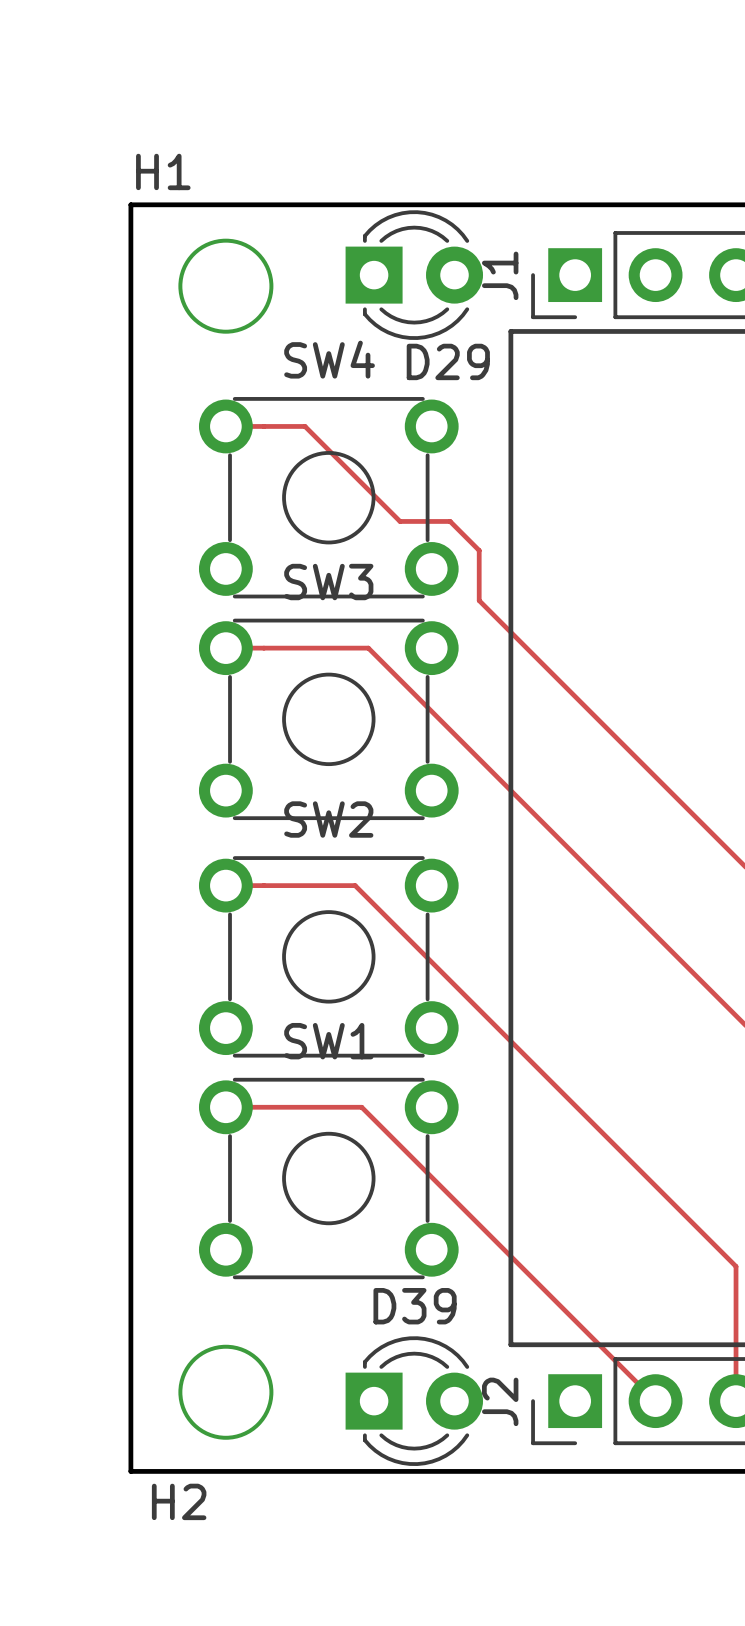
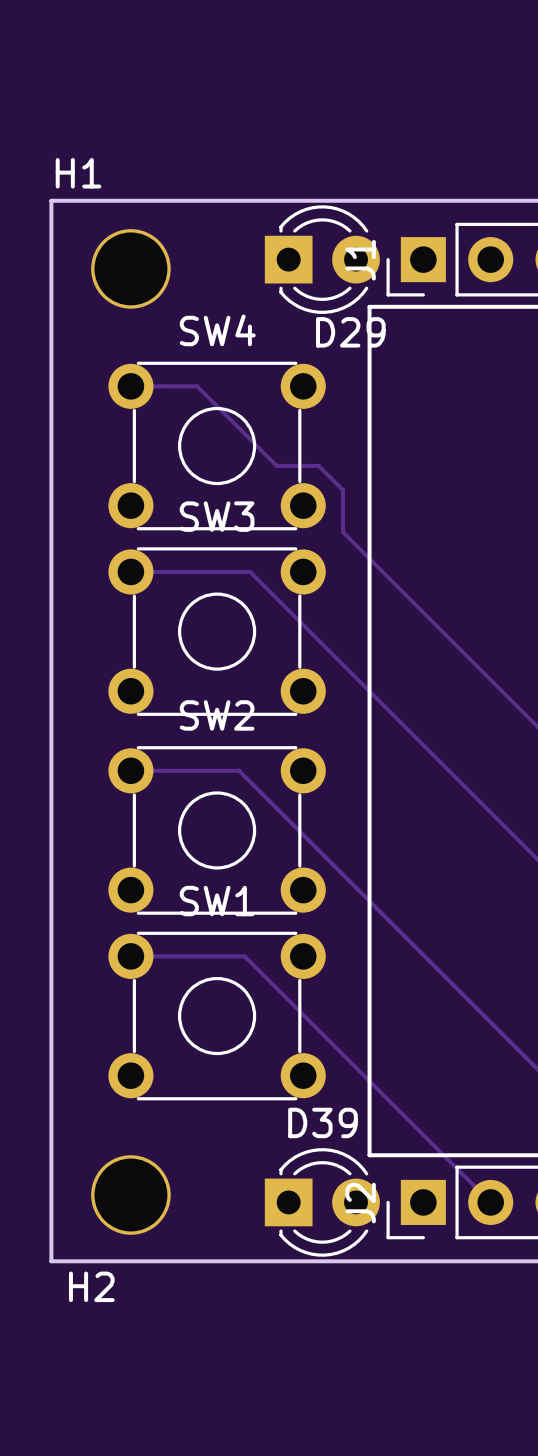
D29 position: (414, 275) -> (322, 259)
D39 position: (414, 1401) -> (322, 1202)

